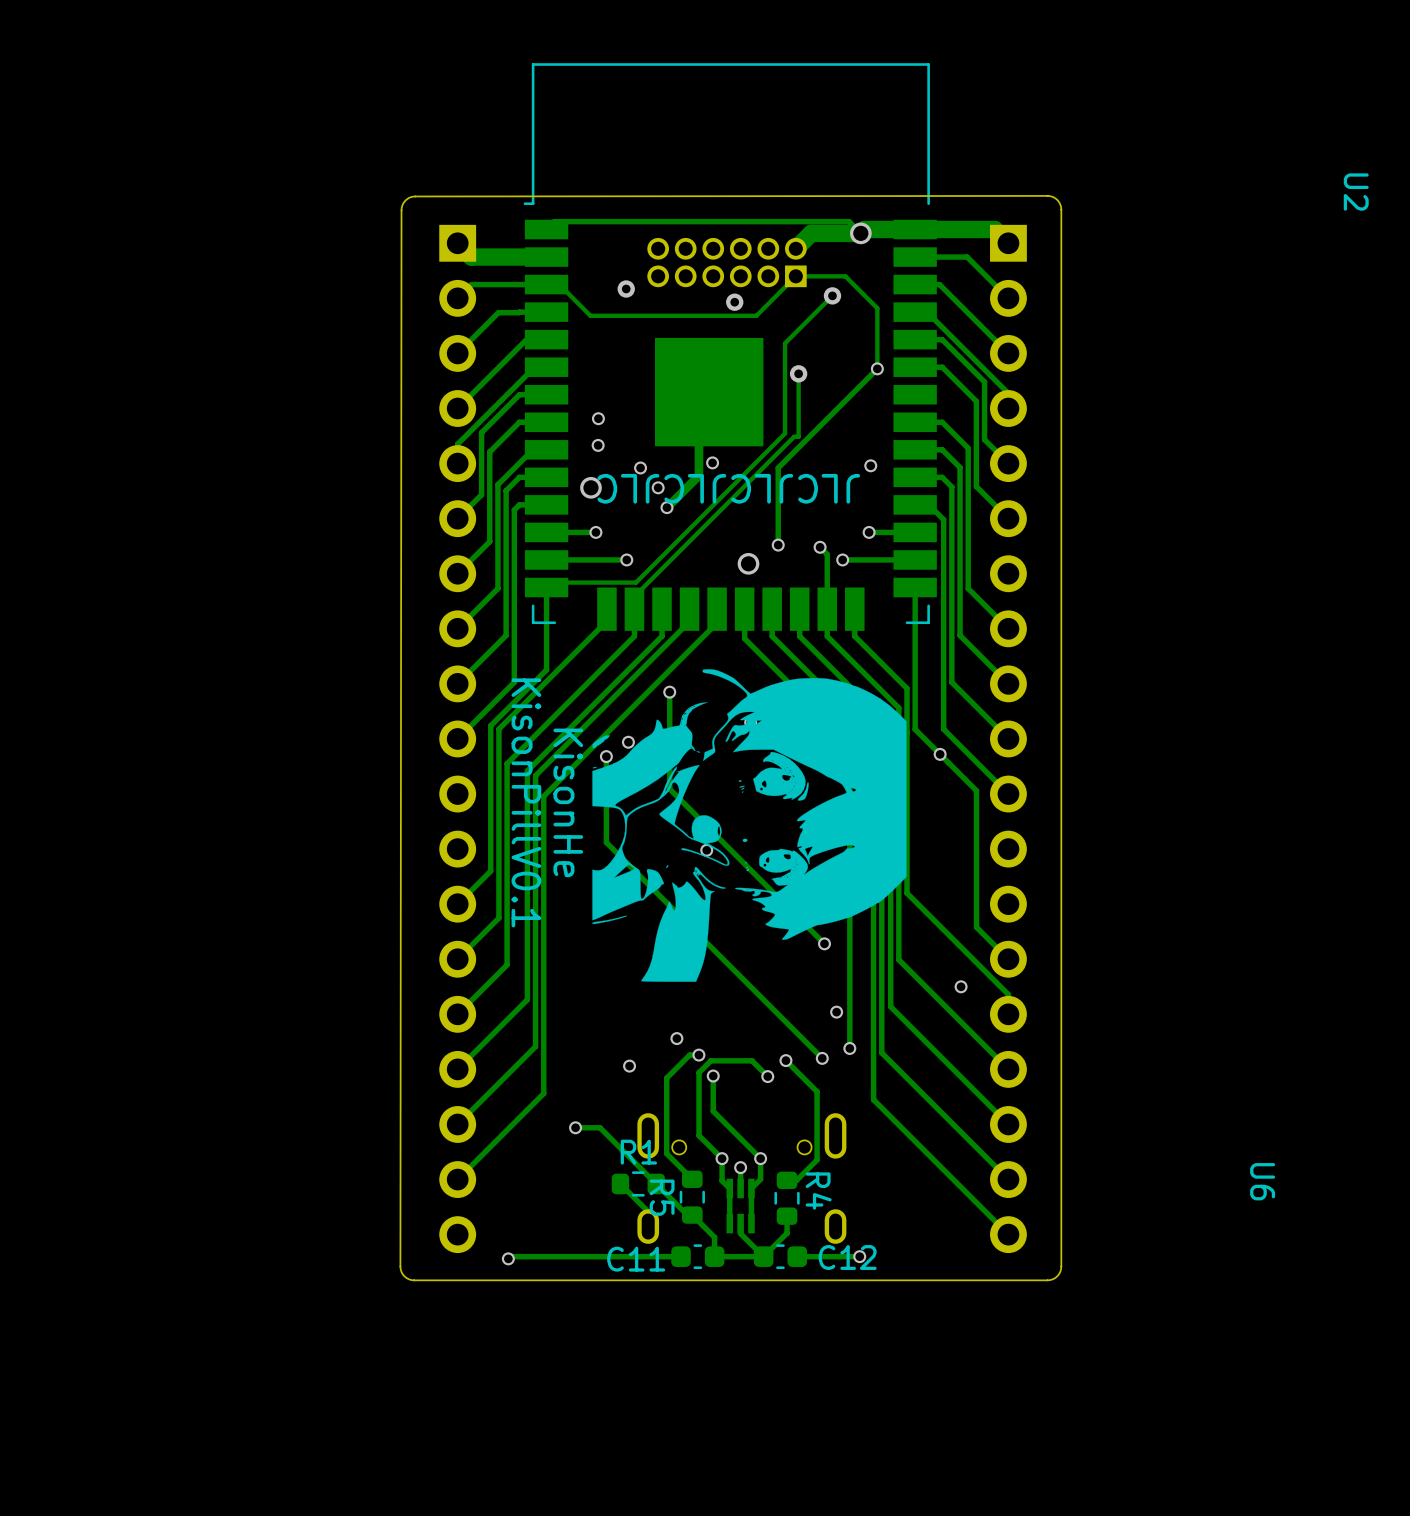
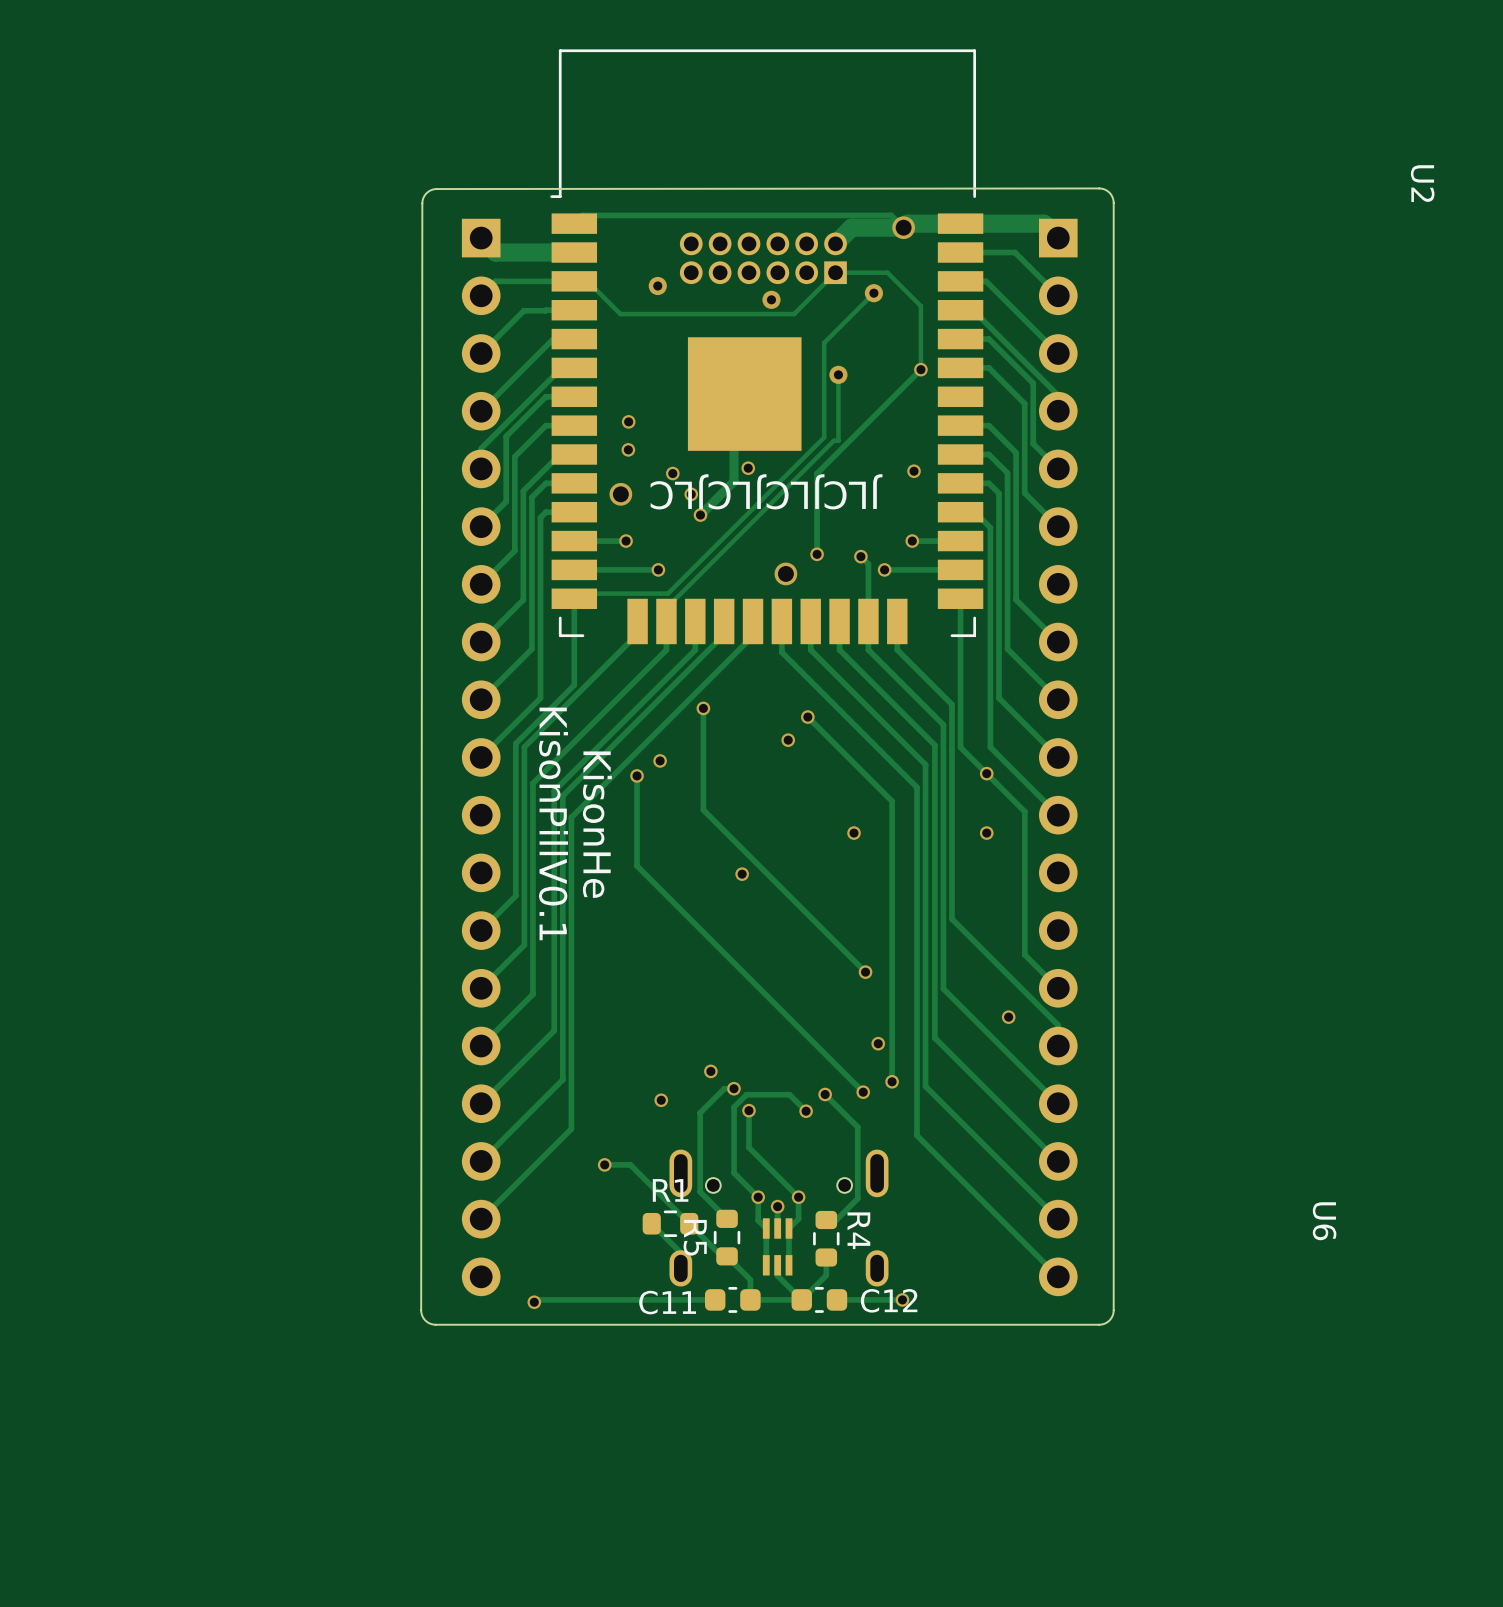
drawing: [592, 669, 907, 982] -> none
via: none -> (854, 833)
via: none -> (986, 833)

